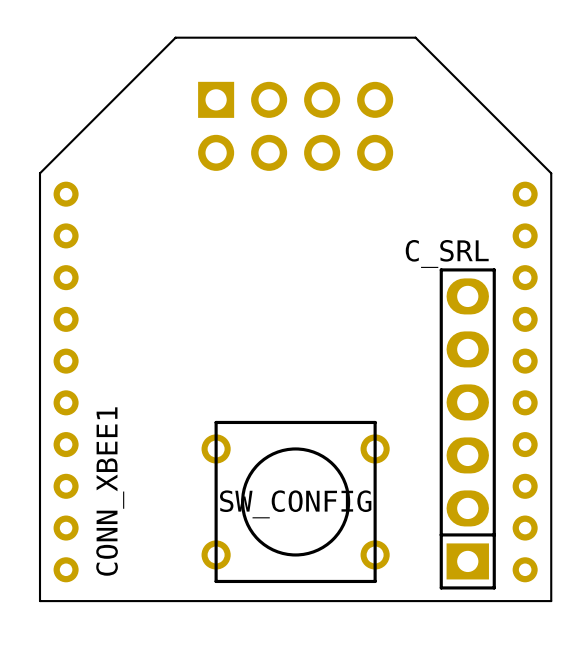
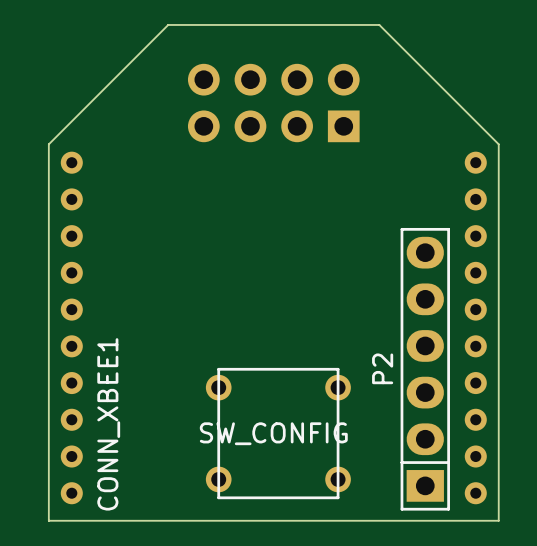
part rotation: 0° (295, 126) -> 180° (273, 103)
C_SRL name: C_SRL (447, 253) -> P2 (382, 368)
part footprint: [201, 420, 390, 584] -> [205, 367, 351, 500]

